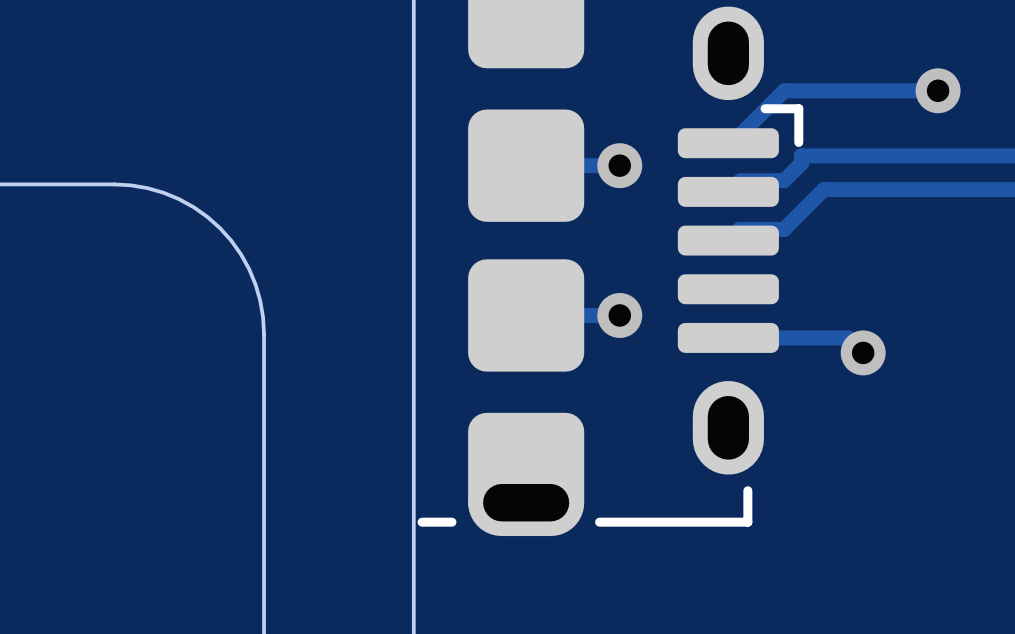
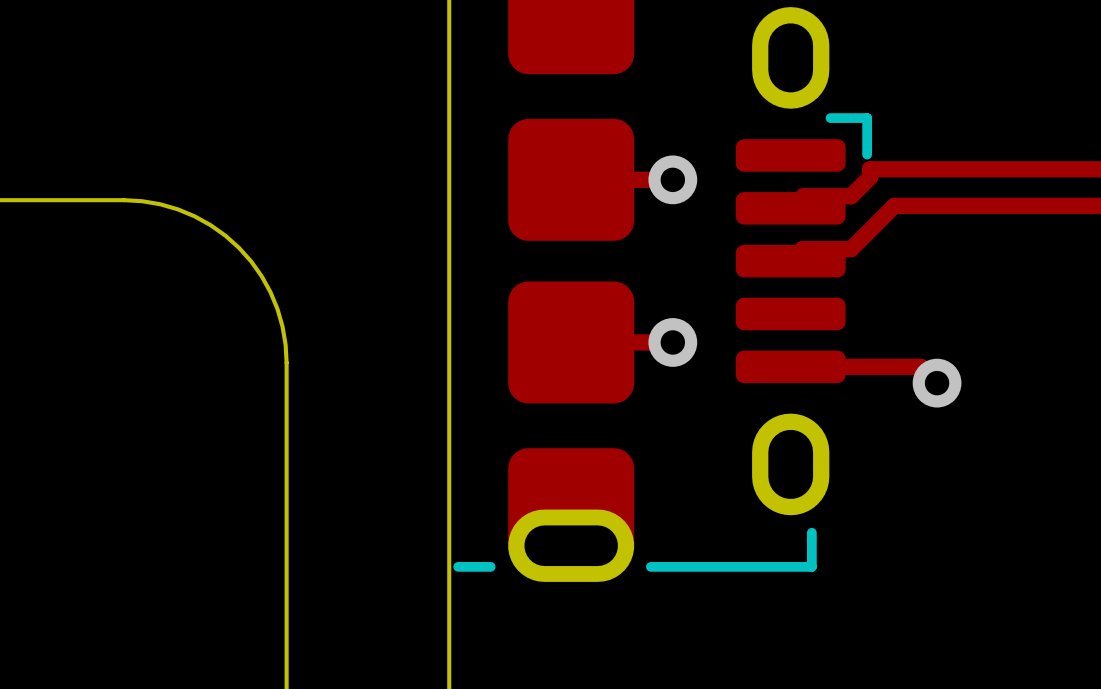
track: (938, 90) (784, 90) (731, 143) (728, 143) -> none
via: (938, 90) -> none

